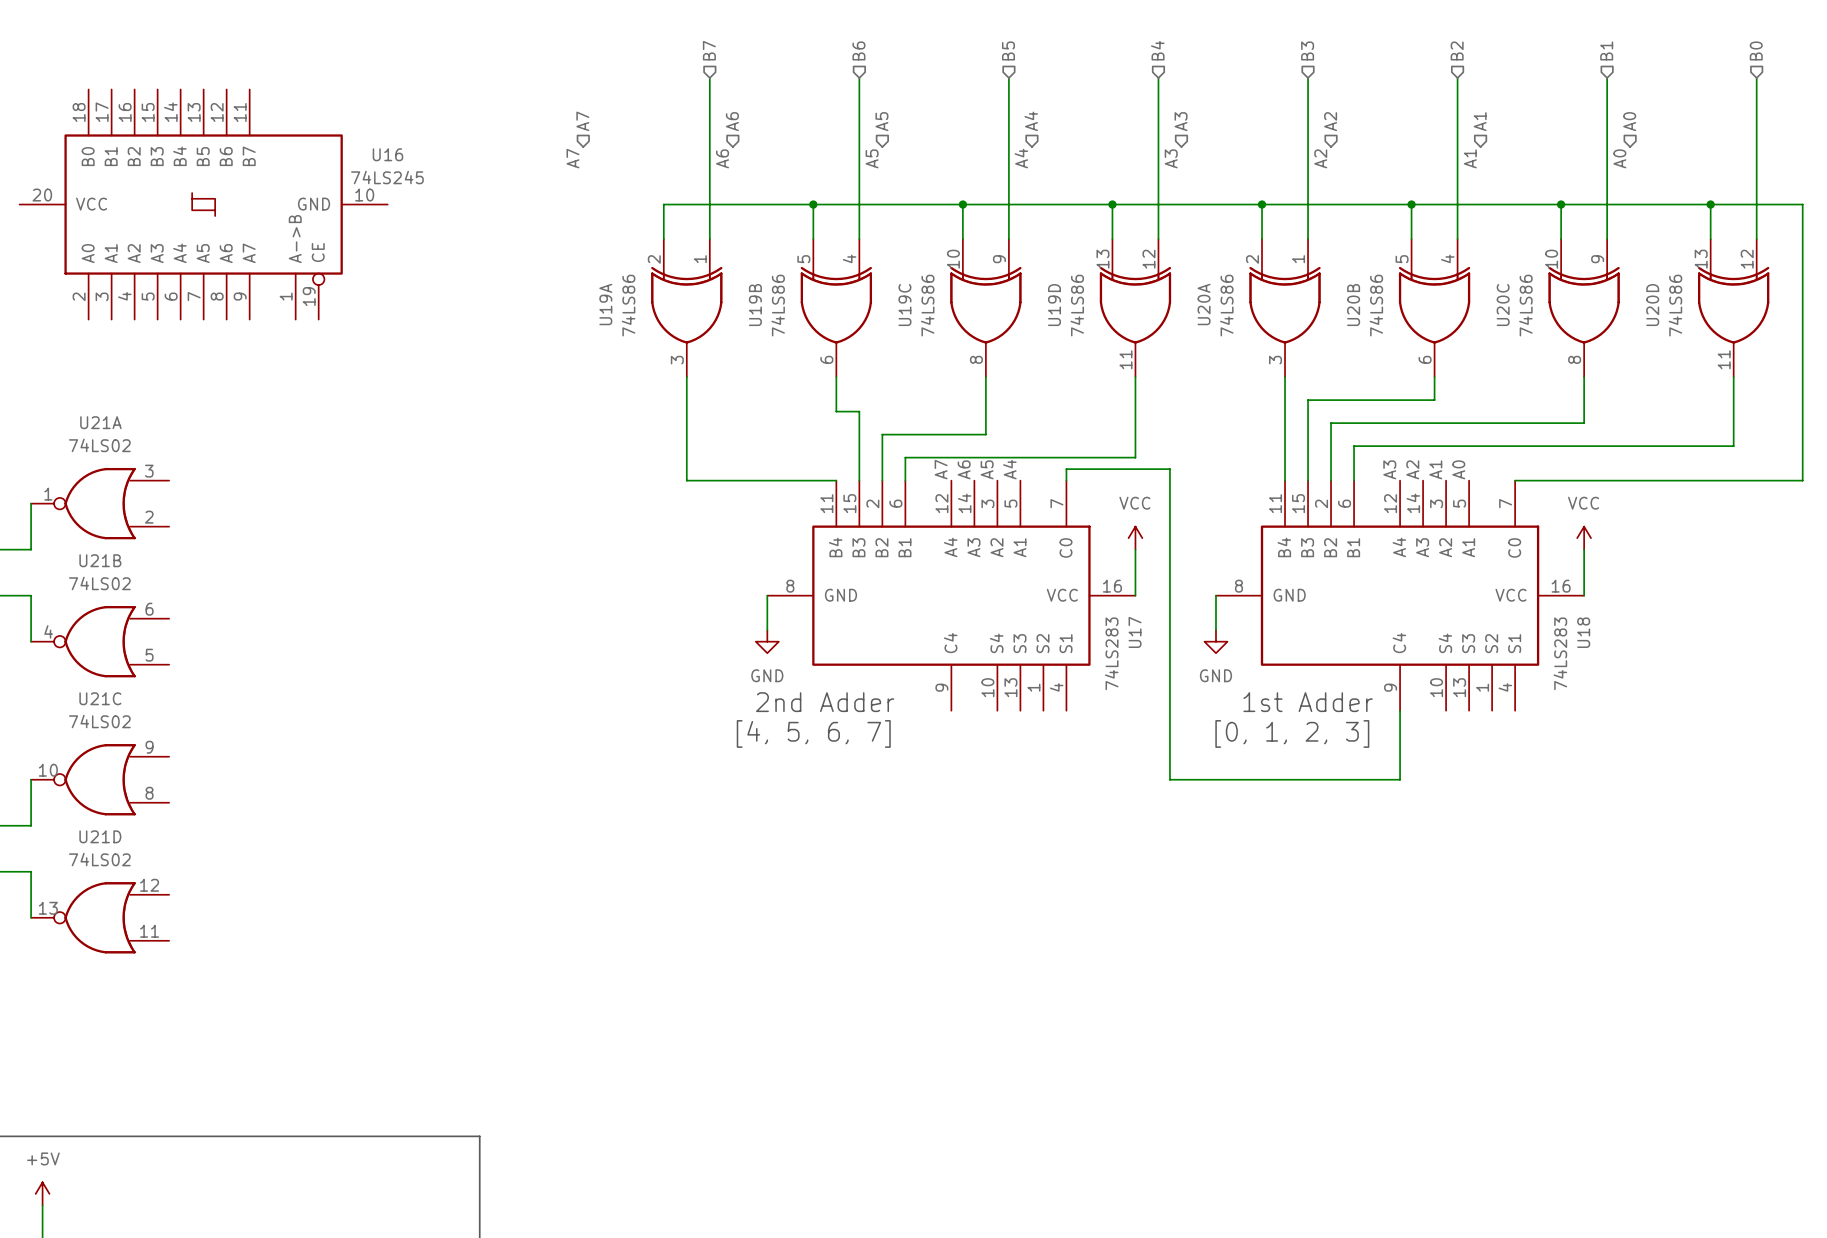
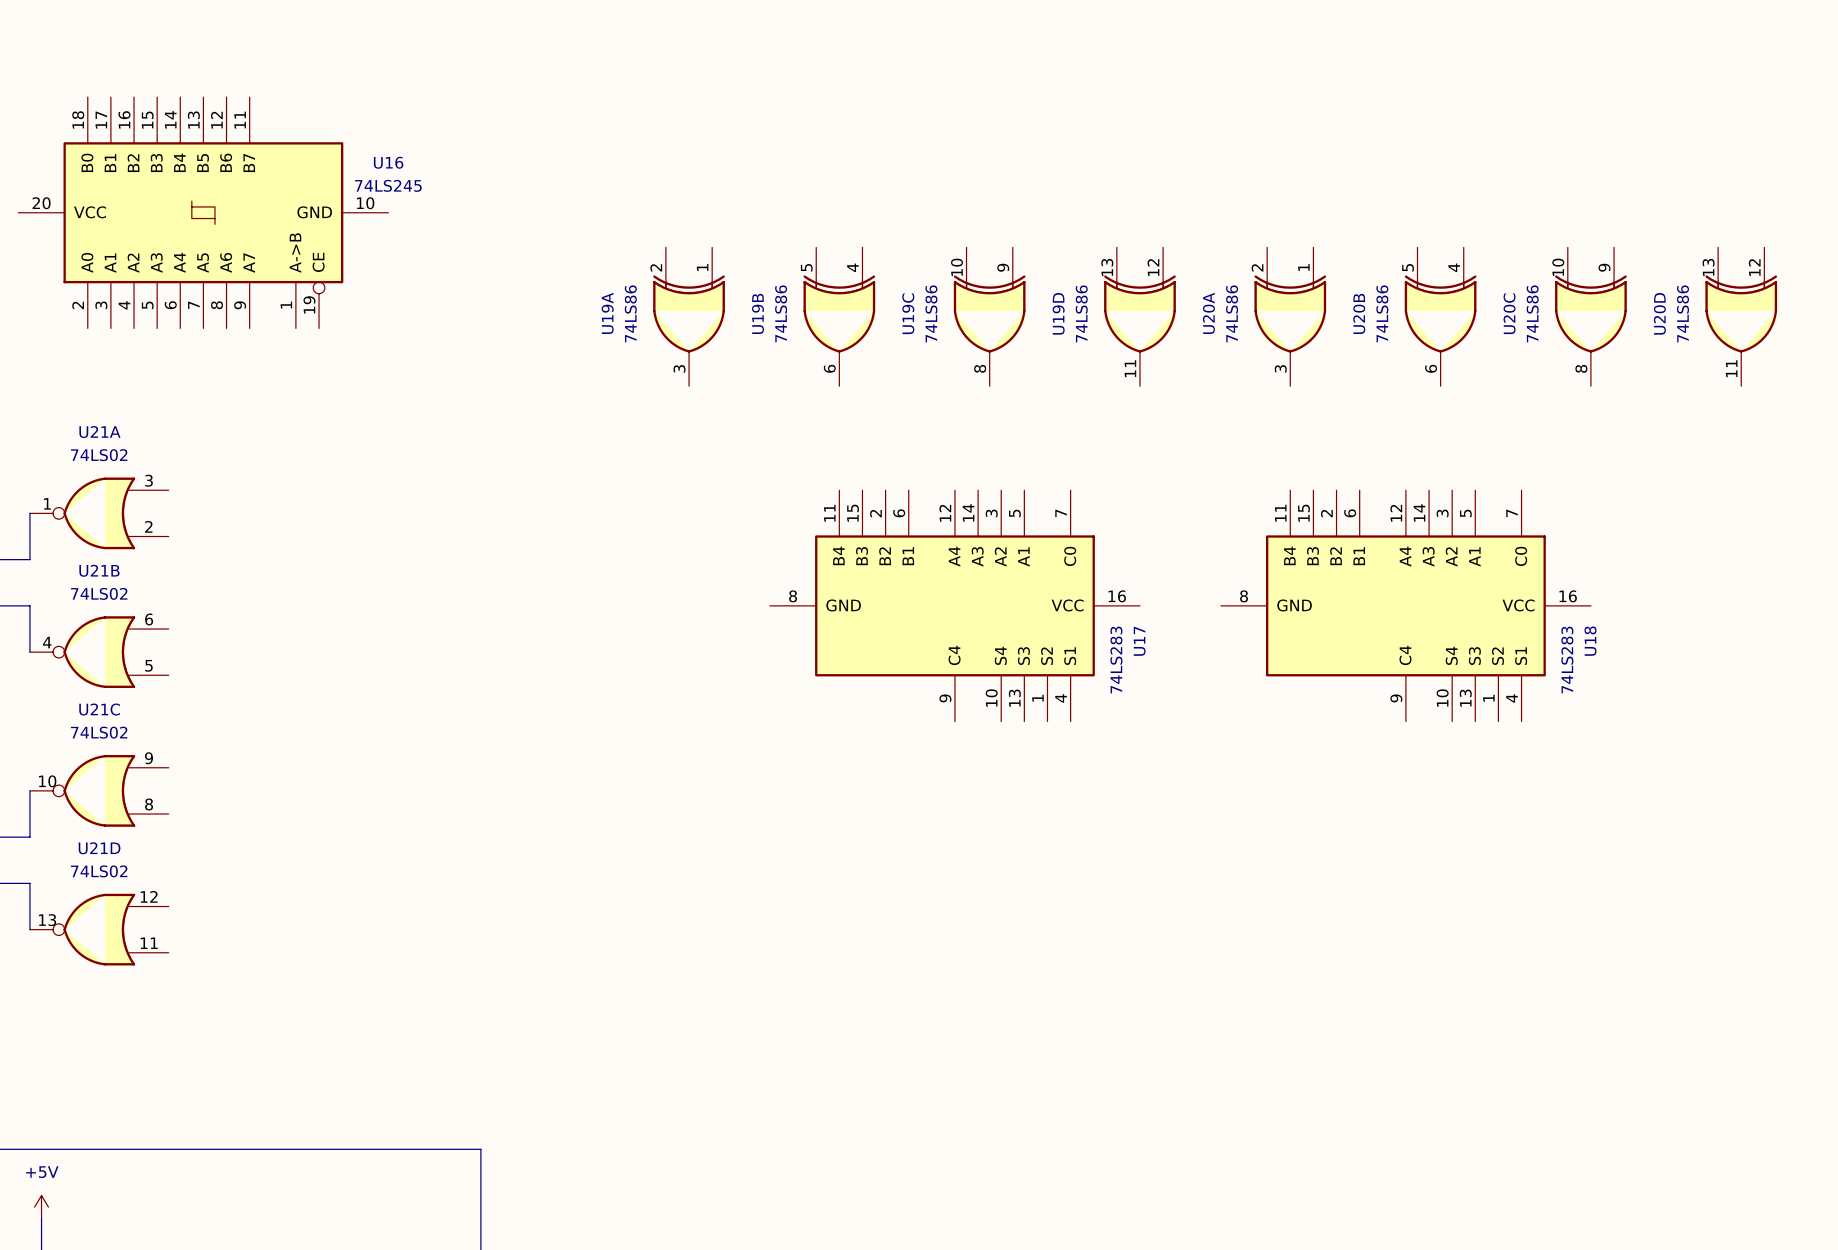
hierarchical label: B7 (709, 50) -> none
hierarchical label: B6 (858, 50) -> none
hierarchical label: B5 (1008, 50) -> none
hierarchical label: B4 (1157, 50) -> none
hierarchical label: B3 (1307, 50) -> none
hierarchical label: B2 (1457, 50) -> none
hierarchical label: B1 (1606, 50) -> none
hierarchical label: B0 (1756, 50) -> none
wire: (709, 77) (709, 239) -> none
wire: (859, 77) (859, 239) -> none
wire: (1008, 77) (1008, 239) -> none
wire: (1158, 77) (1158, 239) -> none
wire: (1308, 77) (1308, 239) -> none
wire: (1457, 77) (1457, 239) -> none
wire: (1607, 77) (1607, 239) -> none
wire: (1756, 77) (1756, 239) -> none
hierarchical label: A7 (582, 121) -> none
hierarchical label: A6 (732, 121) -> none
hierarchical label: A5 (881, 121) -> none
hierarchical label: A4 (1031, 121) -> none
hierarchical label: A3 (1181, 121) -> none
hierarchical label: A2 (1330, 121) -> none
hierarchical label: A1 (1480, 121) -> none
hierarchical label: A0 (1629, 121) -> none
label: A7 (573, 158) -> none
label: A6 (722, 158) -> none
label: A5 (872, 158) -> none
label: A4 (1021, 158) -> none
label: A3 (1171, 158) -> none
label: A2 (1320, 158) -> none
label: A1 (1470, 158) -> none
label: A0 (1619, 158) -> none
wire: (813, 204) (813, 239) -> none
junction: (813, 204) -> none
wire: (962, 204) (962, 239) -> none
junction: (962, 204) -> none
wire: (1112, 204) (1112, 239) -> none
junction: (1112, 204) -> none
wire: (1262, 204) (1262, 239) -> none
junction: (1262, 204) -> none
wire: (1411, 204) (1411, 239) -> none
junction: (1411, 204) -> none
wire: (1561, 204) (1561, 239) -> none
junction: (1561, 204) -> none
wire: (1710, 204) (1710, 239) -> none
junction: (1710, 204) -> none
wire: (663, 239) (663, 204) (1802, 204) (1802, 480) (1515, 480) -> none
wire: (686, 377) (686, 480) (836, 480) -> none
wire: (836, 377) (836, 411) (859, 411) (859, 480) -> none
wire: (985, 377) (985, 434) (882, 434) (882, 480) -> none
wire: (1135, 377) (1135, 457) (905, 457) (905, 480) -> none
wire: (1285, 377) (1285, 480) -> none
wire: (1434, 377) (1434, 400) (1308, 400) (1308, 480) -> none
wire: (1584, 377) (1584, 423) (1331, 423) (1331, 480) -> none
wire: (1733, 377) (1733, 446) (1354, 446) (1354, 480) -> none
label: A7 (941, 469) -> none
label: A6 (964, 469) -> none
label: A5 (987, 469) -> none
label: A4 (1009, 469) -> none
label: A3 (1389, 469) -> none
label: A2 (1412, 469) -> none
label: A1 (1435, 469) -> none
label: A0 (1458, 469) -> none
wire: (1066, 480) (1066, 469) (1169, 469) (1169, 779) (1400, 779) (1400, 710) -> none
power symbol: VCC (1135, 538) -> none
power symbol: VCC (1584, 538) -> none
wire: (1135, 549) (1135, 595) -> none
wire: (1584, 549) (1584, 595) -> none
wire: (767, 595) (767, 630) -> none
wire: (1215, 595) (1215, 630) -> none
power symbol: GND (767, 641) -> none
power symbol: GND (1215, 641) -> none
text: 2nd Adder (825, 702) -> none
text: 1st Adder (1308, 702) -> none
text: [4, 5, 6, 7] (813, 733) -> none
text: [0, 1, 2, 3] (1292, 733) -> none

